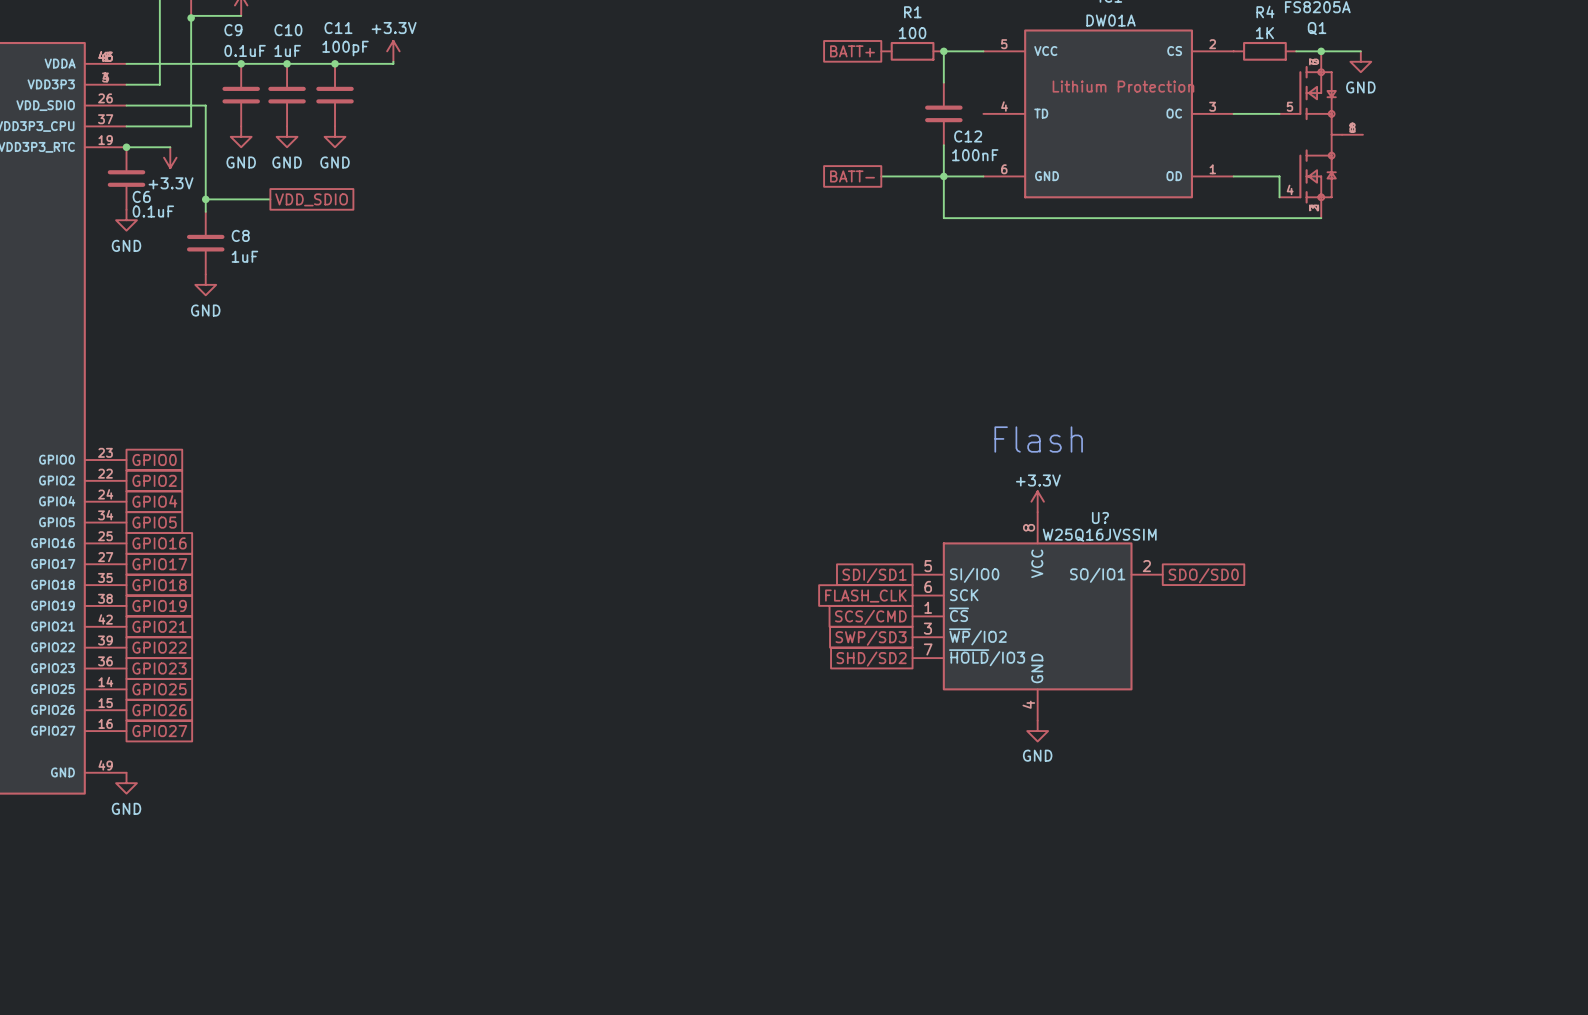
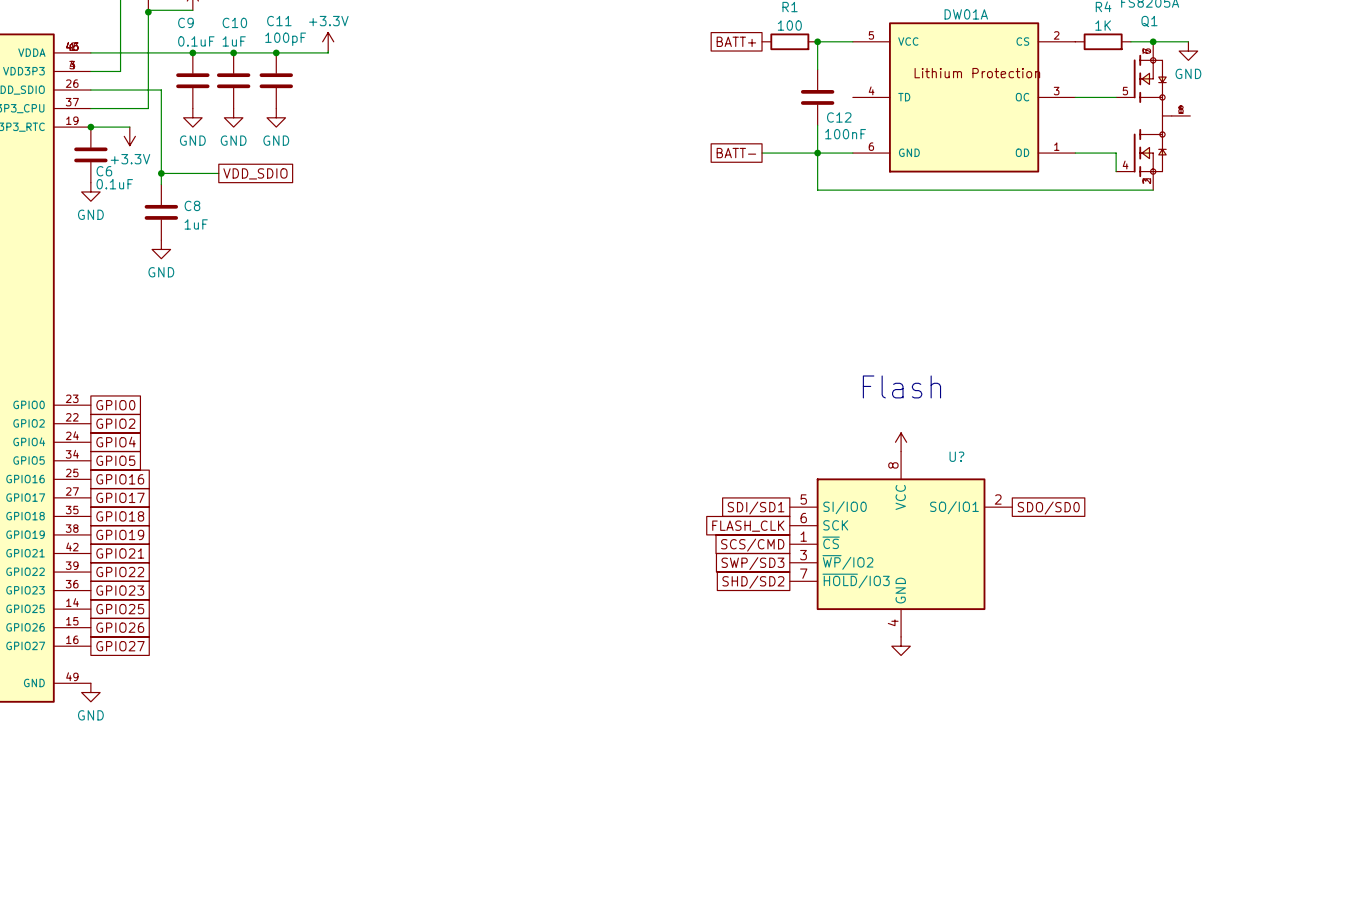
power symbol text: +3.3V (1038, 480) -> none
U? value: W25Q16JVSSIM (1099, 535) -> none
power symbol text: GND (1037, 755) -> none

